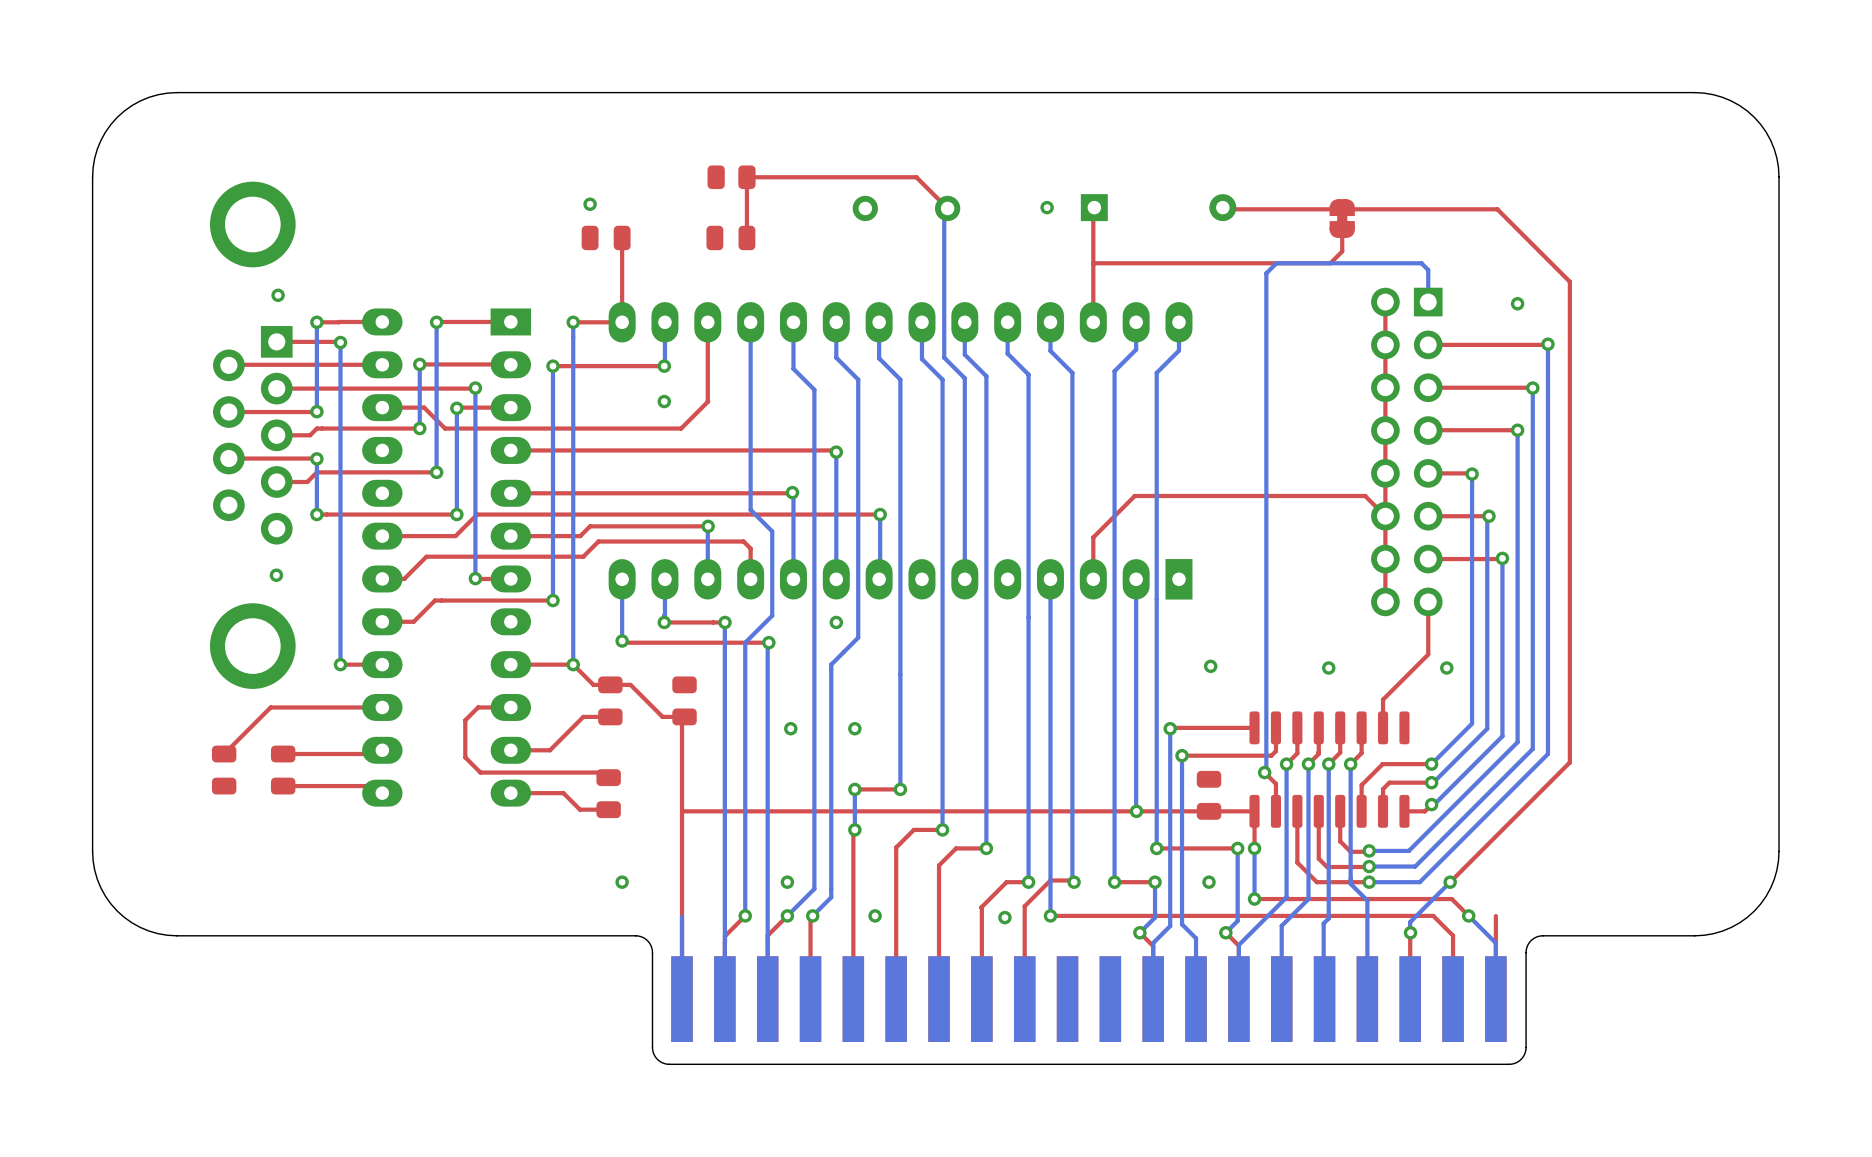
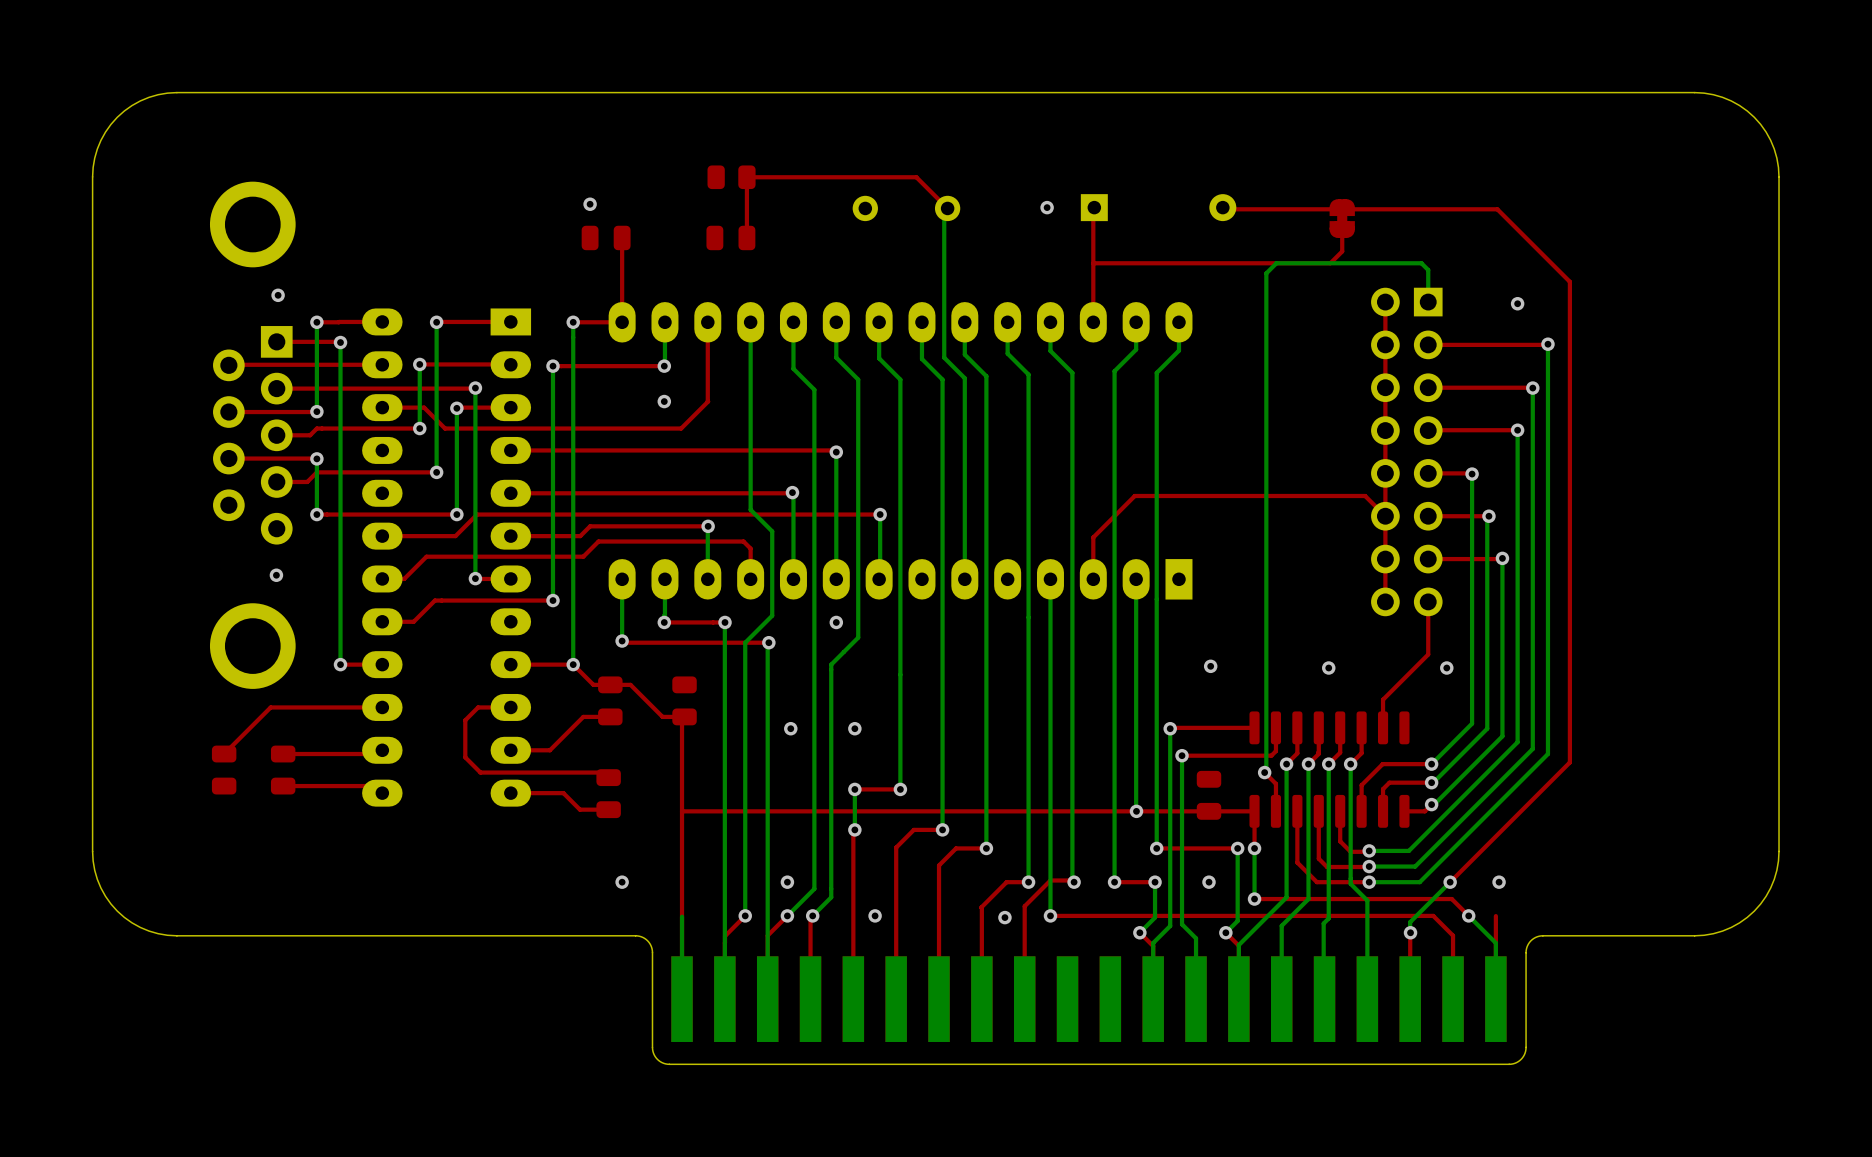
via: none -> (1499, 882)

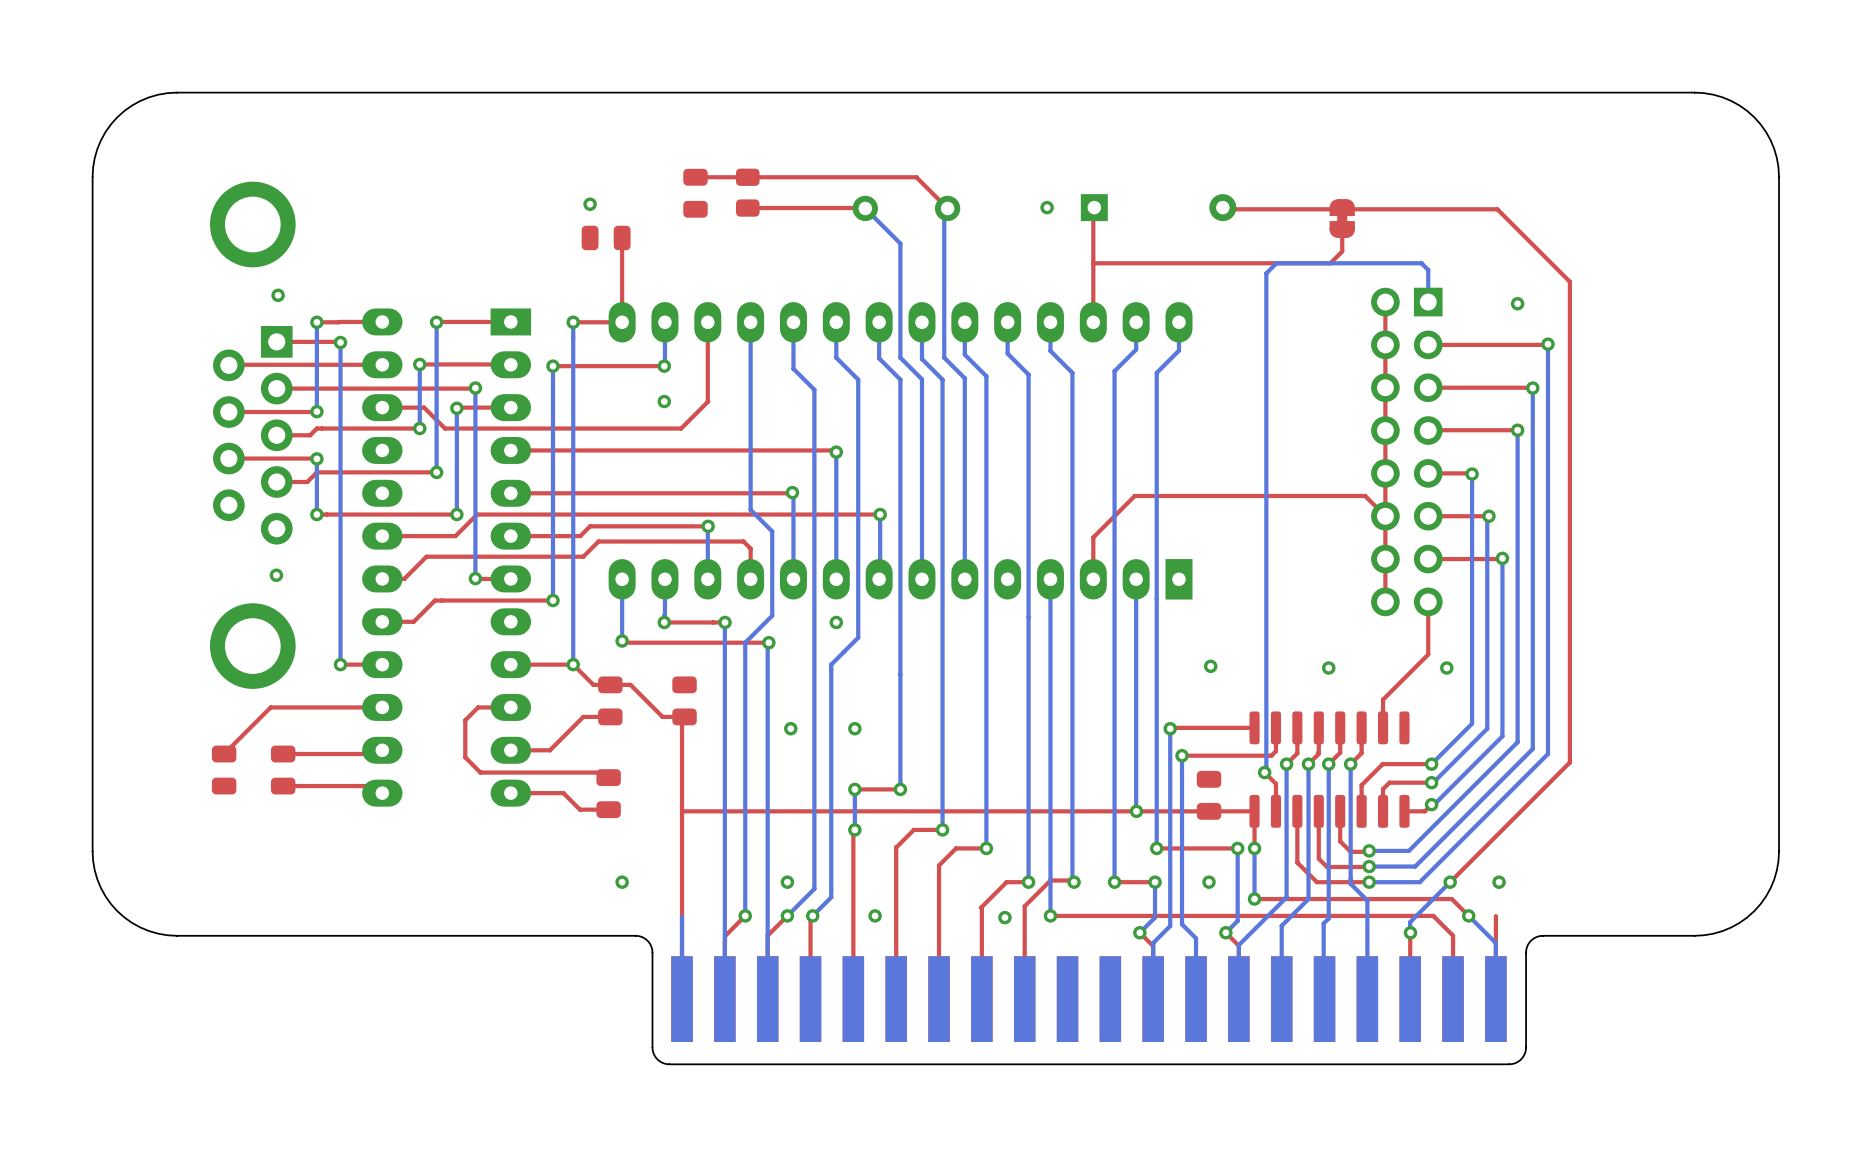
part rotation: 0° (731, 177) -> 90° clockwise (747, 192)
top track: (746, 177) (746, 237) -> (746, 177) (695, 177)
top track: none -> (747, 208) (865, 208)
bottom track: none -> (865, 208) (900, 243) (900, 357) (921, 379) (921, 579)
part rotation: 0° (730, 237) -> 90° clockwise (695, 193)
part position: (730, 237) -> (695, 193)

